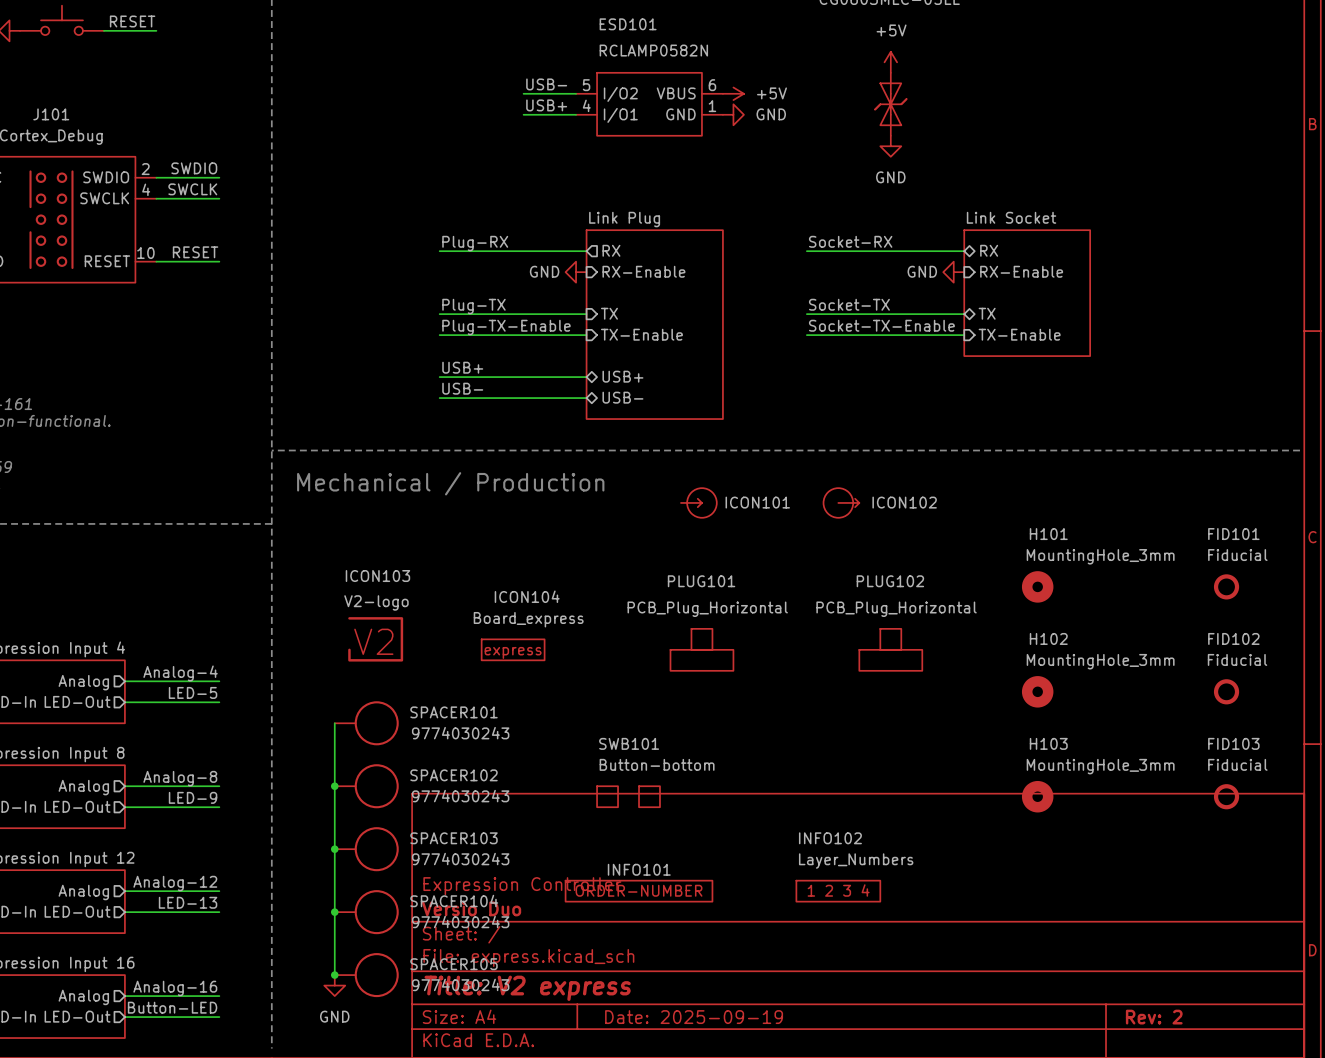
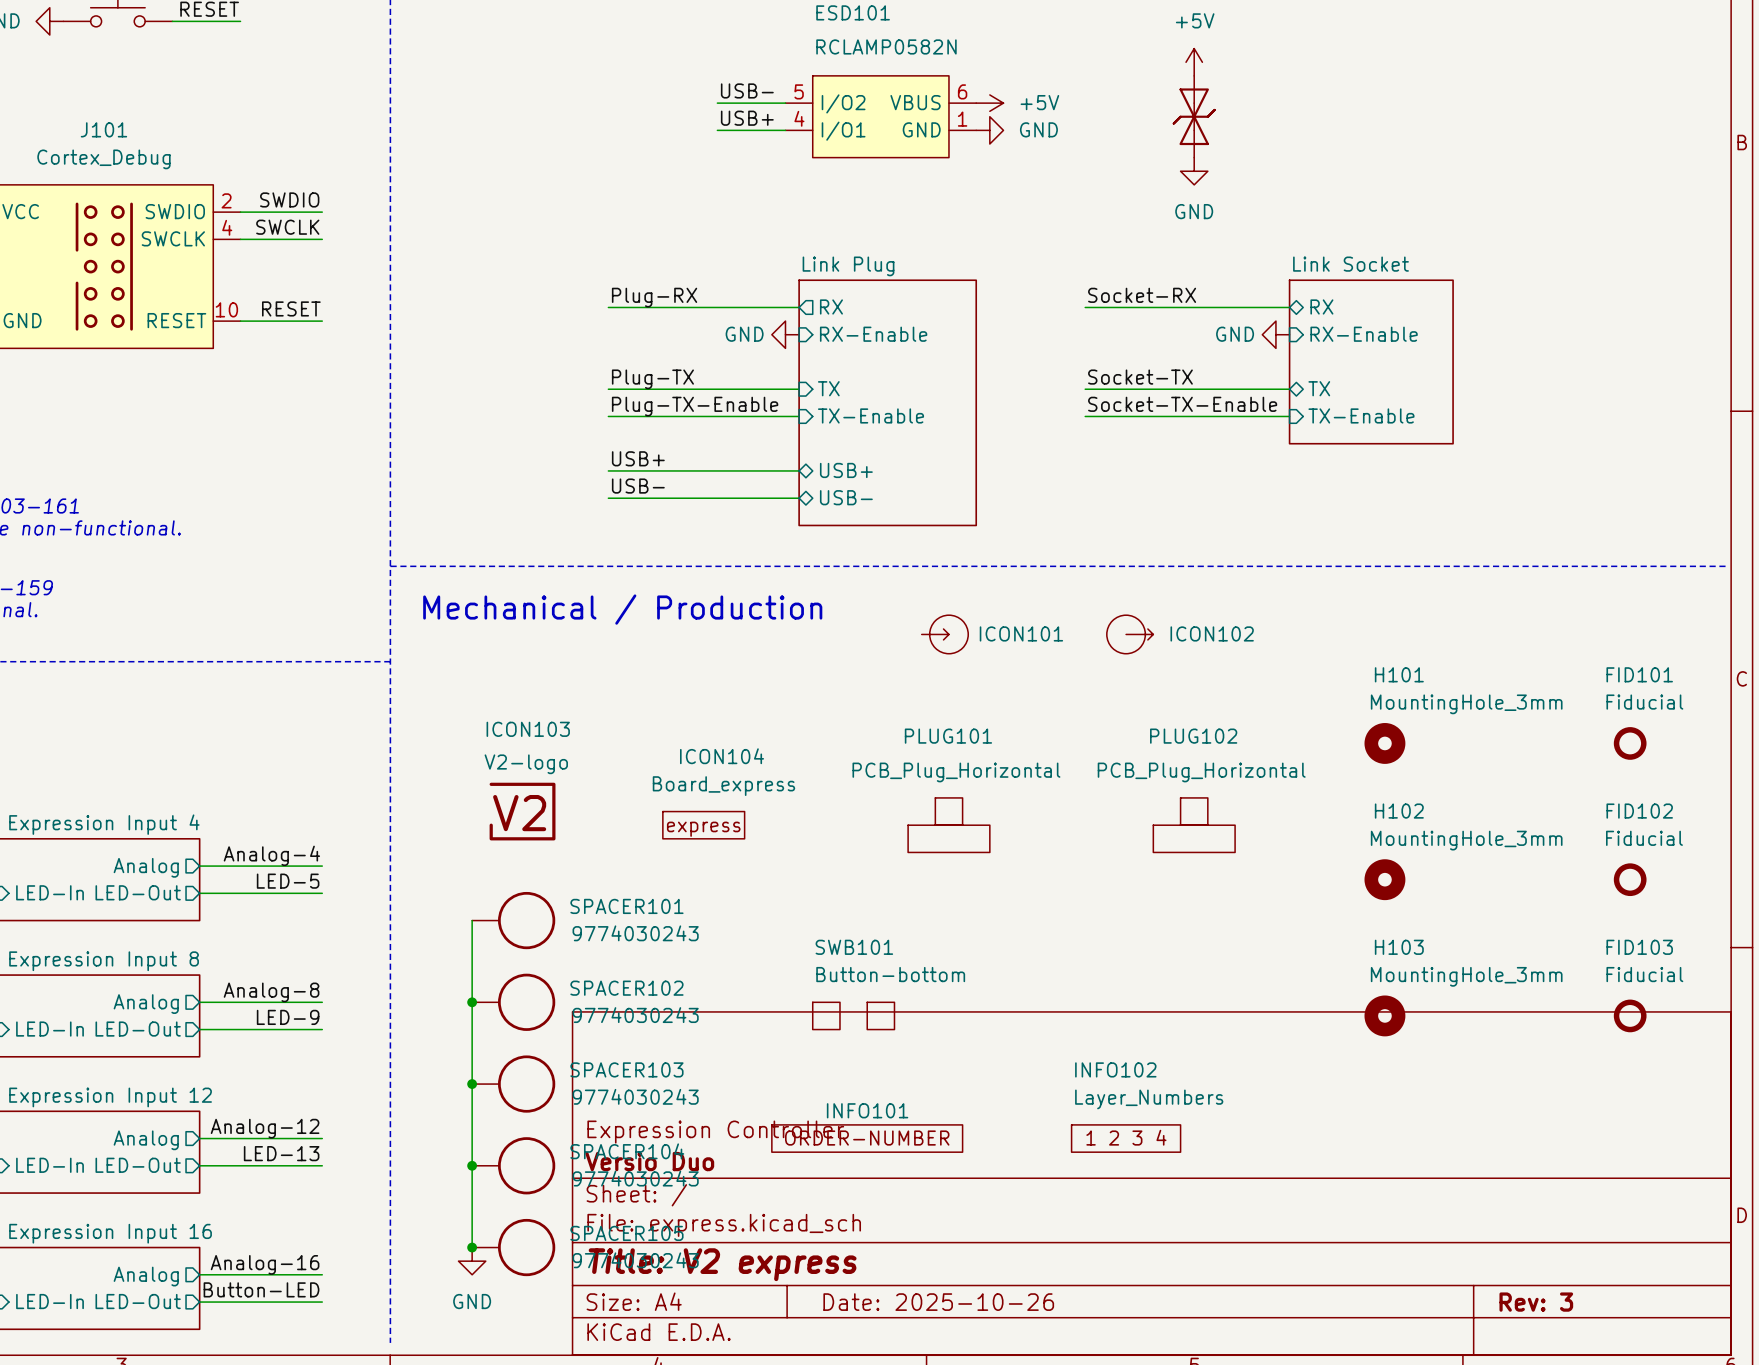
ICON103 symbol: [348, 617, 404, 662] -> [489, 782, 556, 841]
title block: Date: 2025-09-19 (694, 1017) -> Date: 2025-10-26 (938, 1302)
title block: Rev: 2 (1154, 1017) -> Rev: 3 (1536, 1302)

